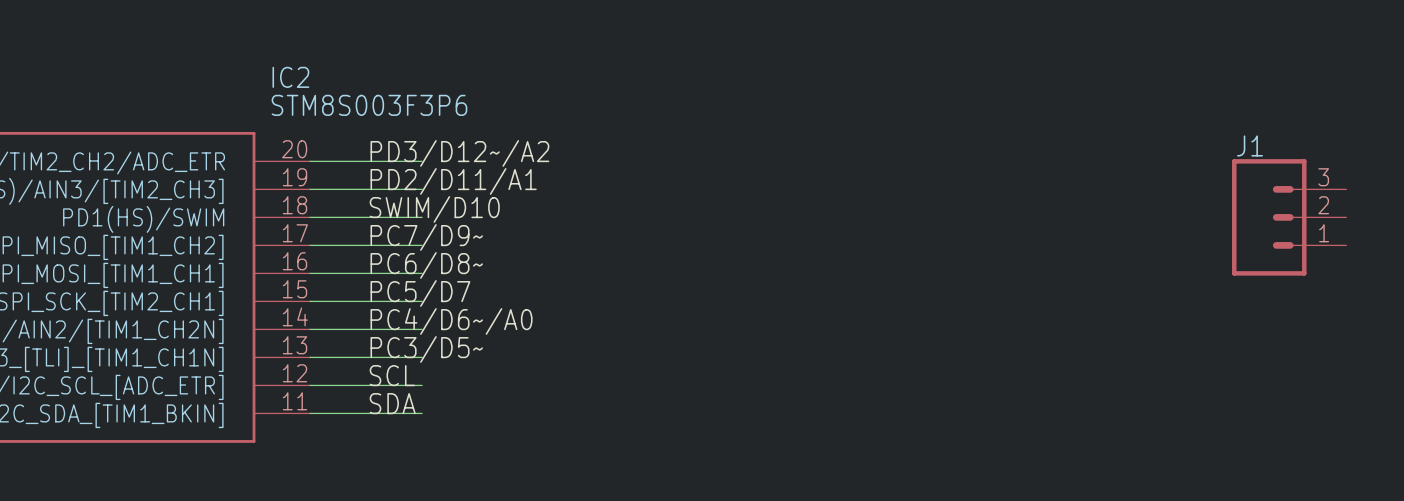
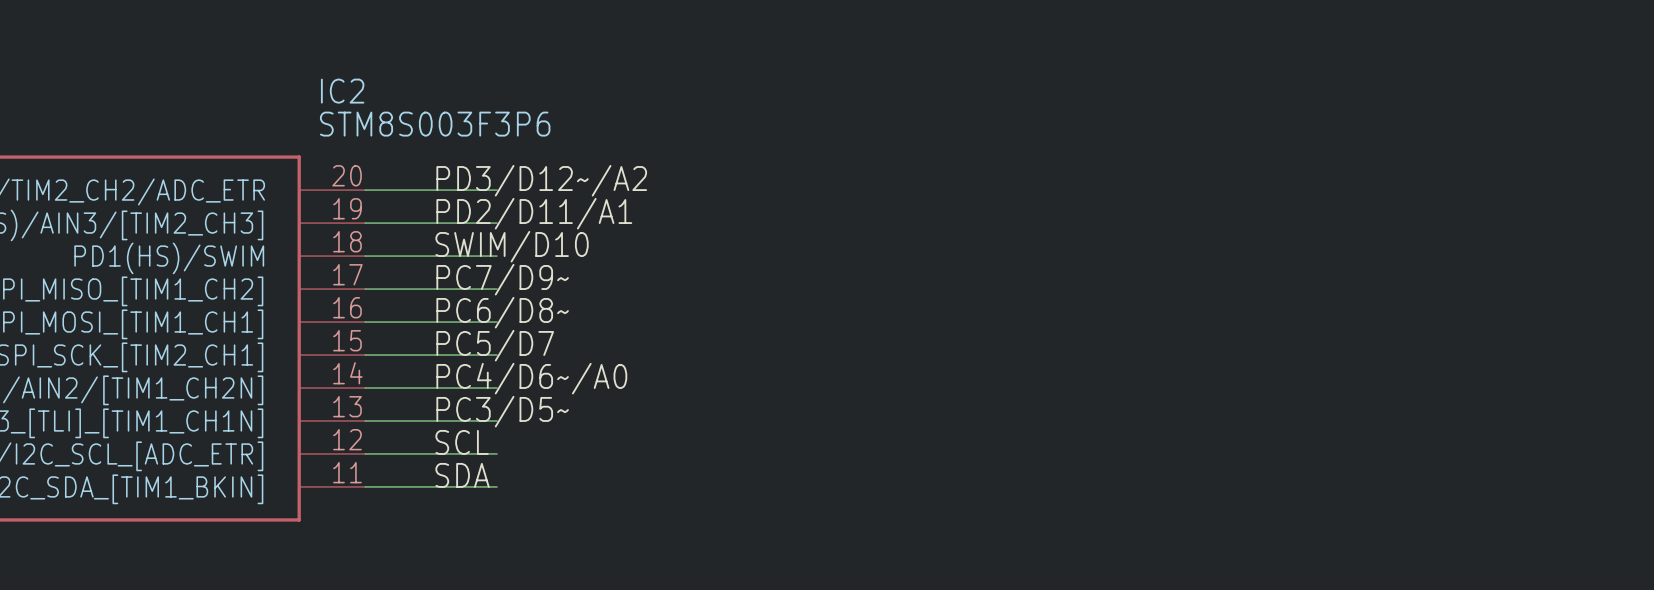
J1: (1289, 217) -> none

